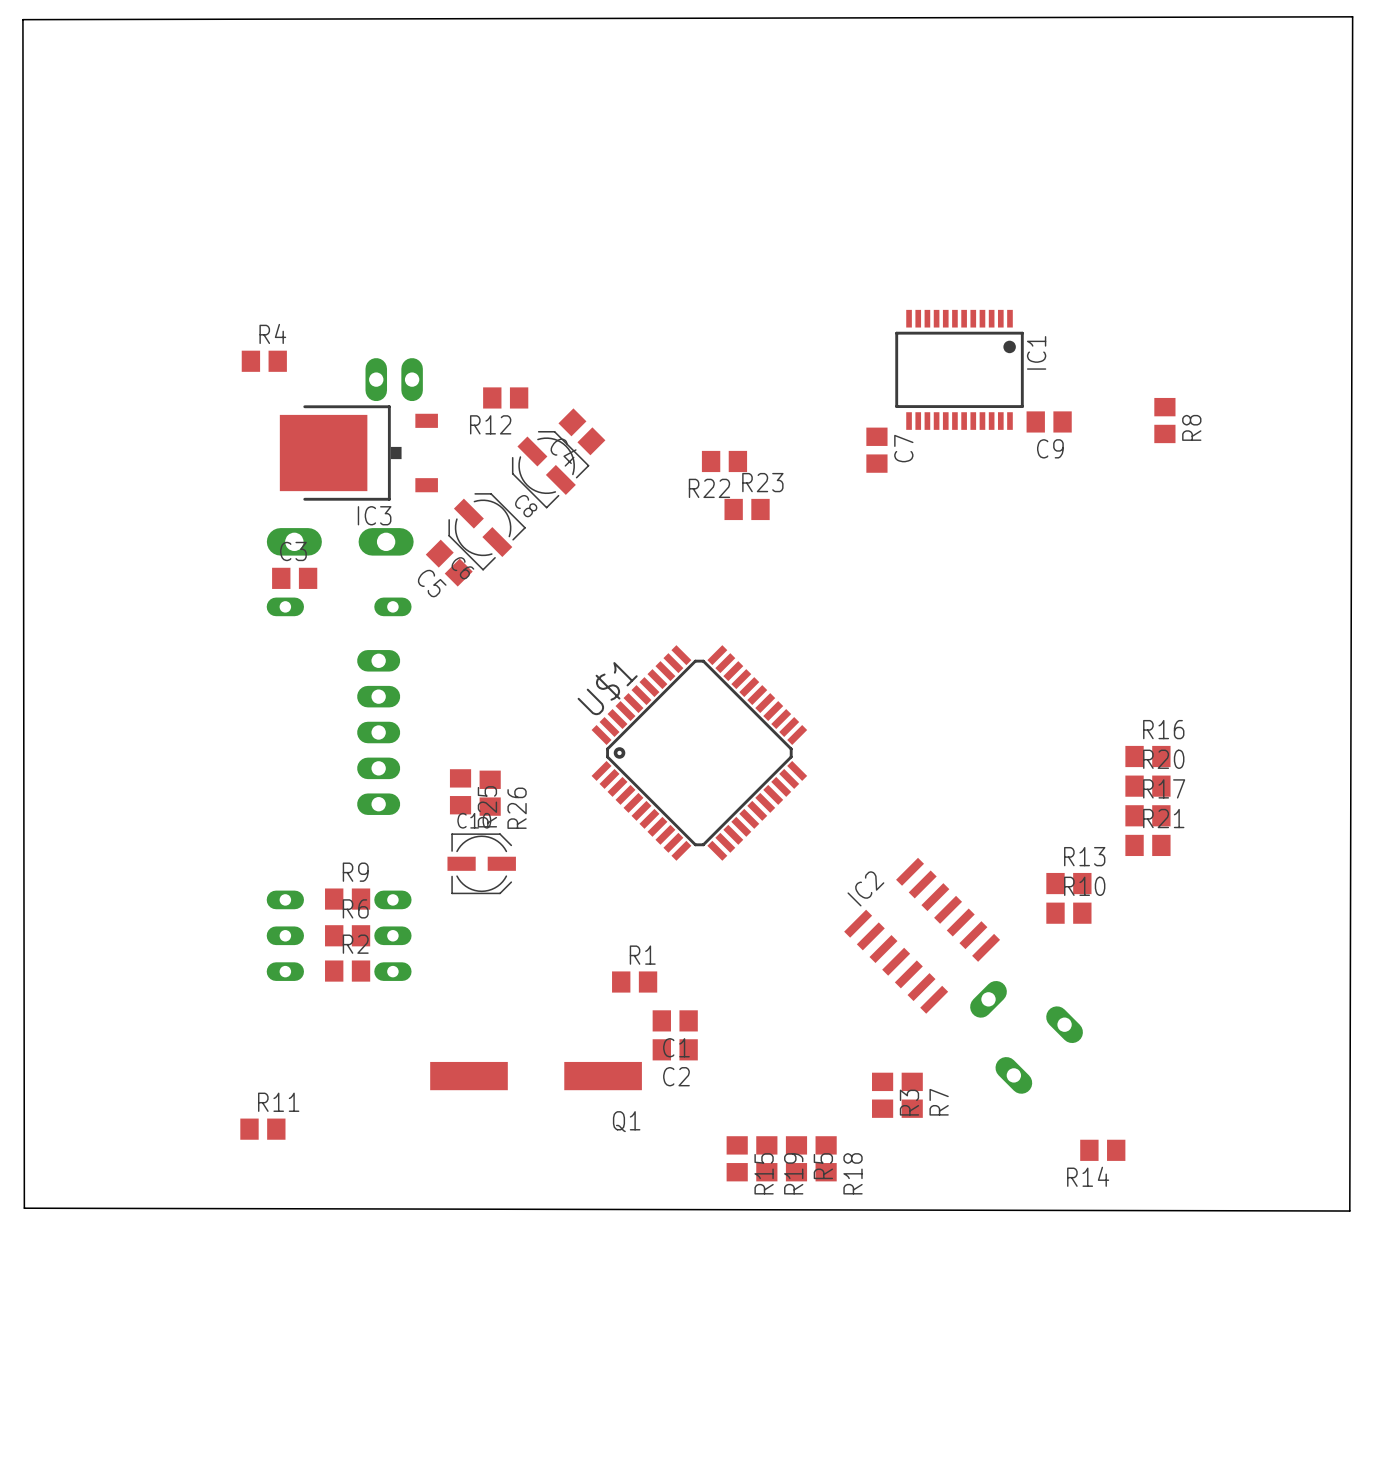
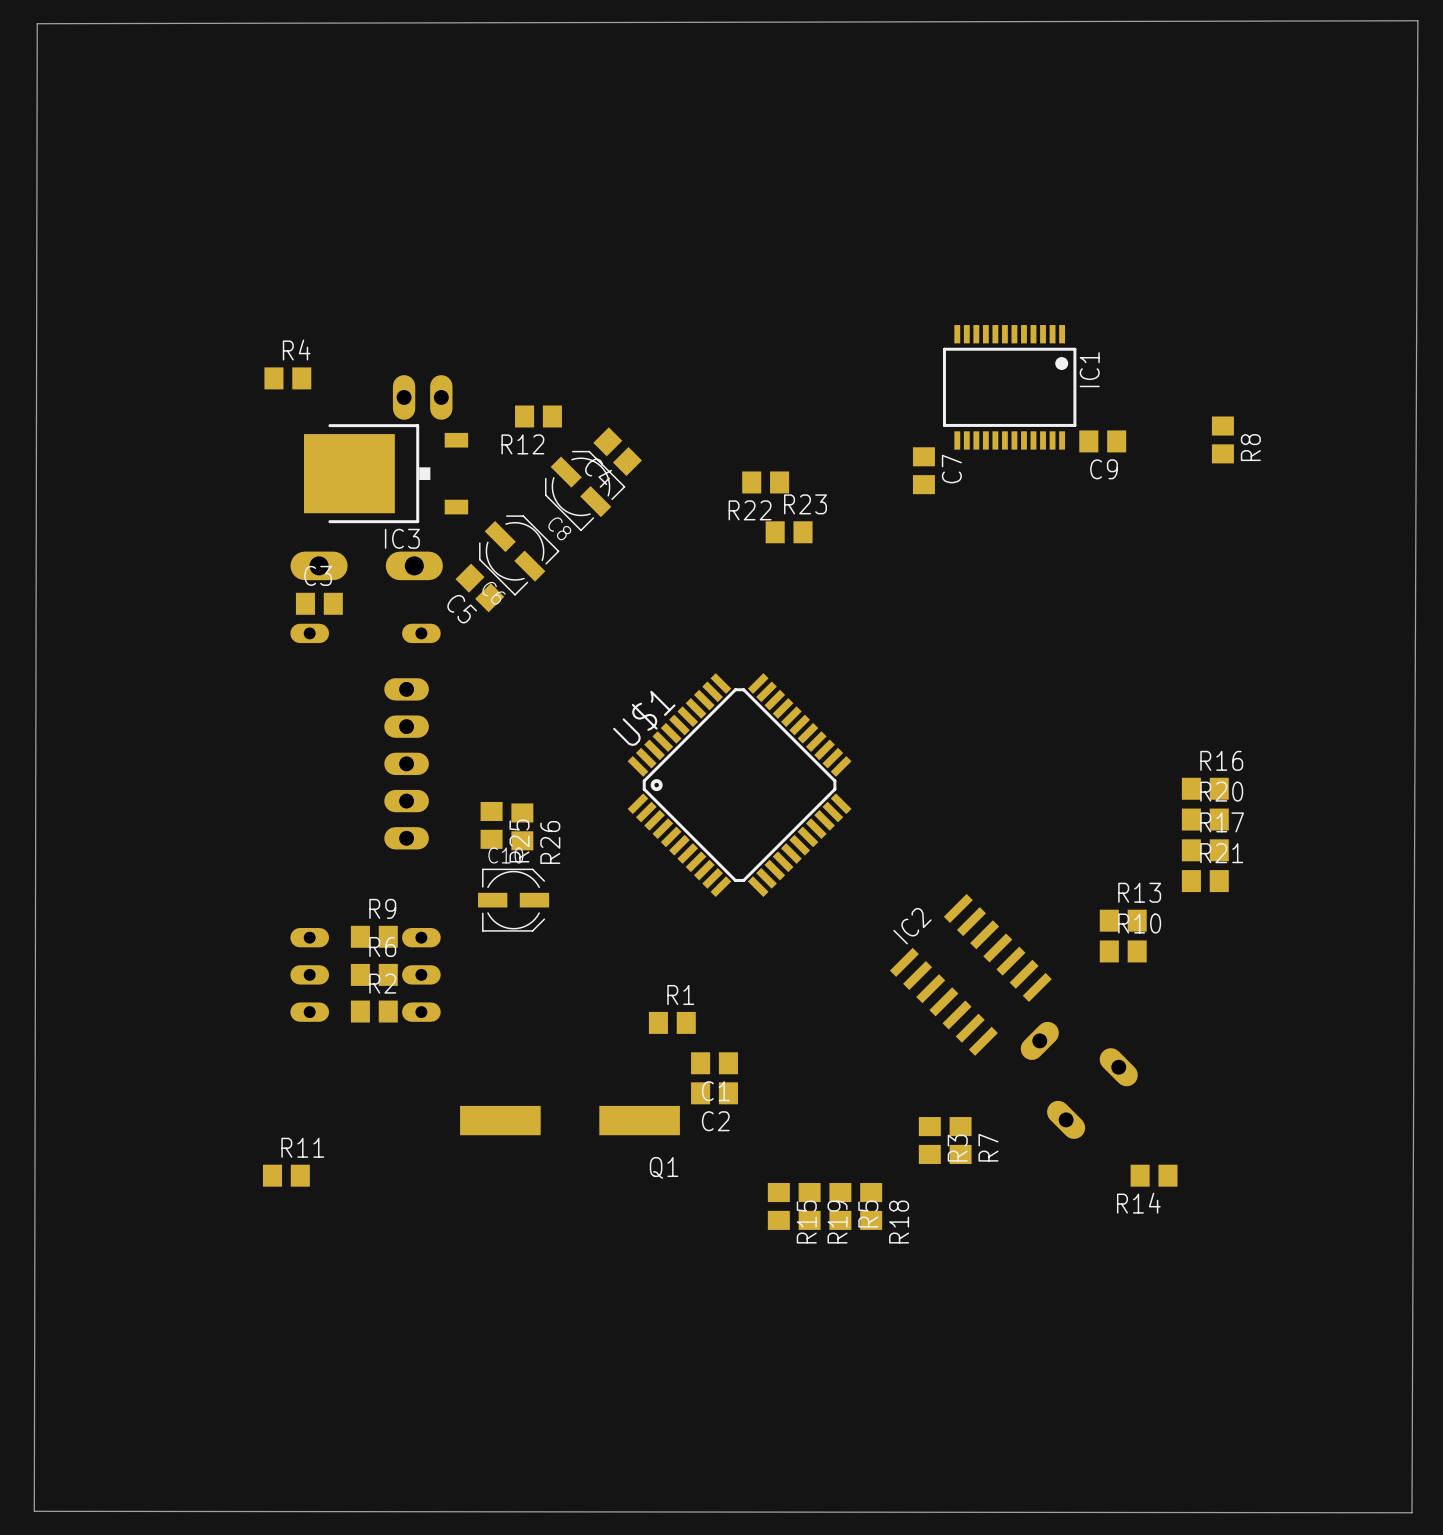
board edge: (1352, 16) (1349, 1211) (24, 1208) (22, 19) -> (1417, 20) (1411, 1512) (34, 1511) (37, 23)
R14 position: (1102, 1150) -> (1154, 1175)

